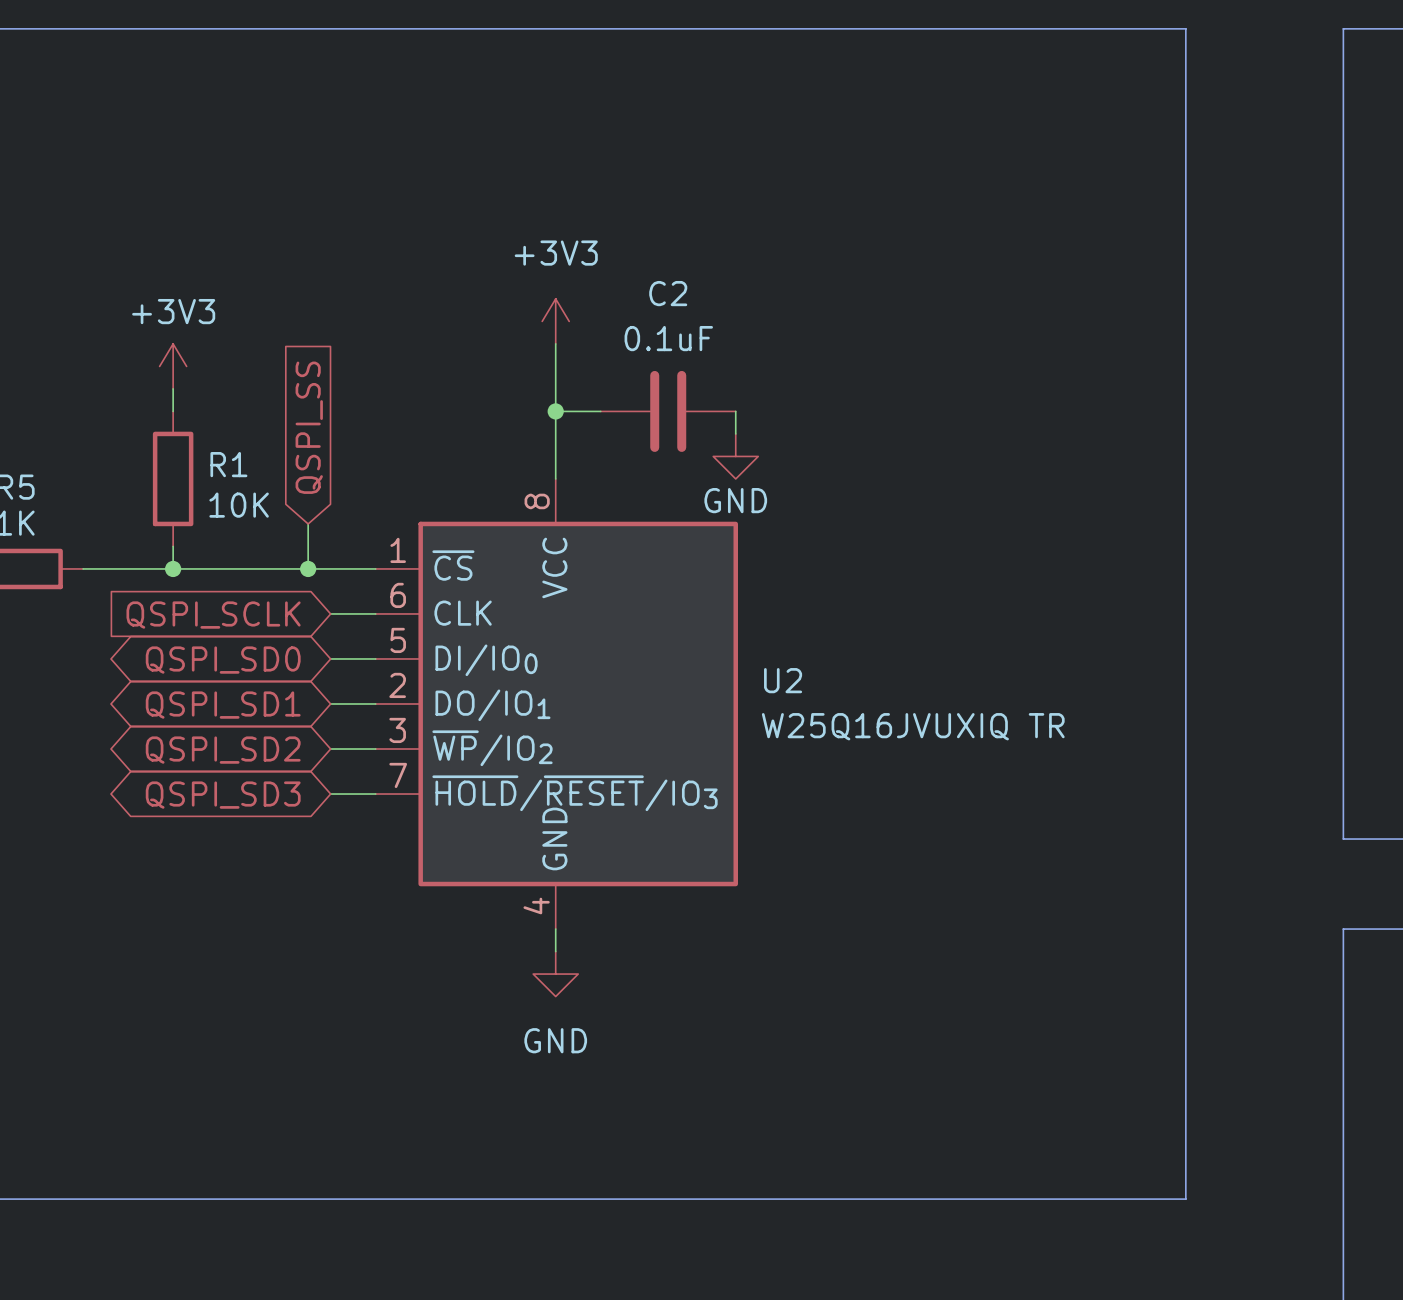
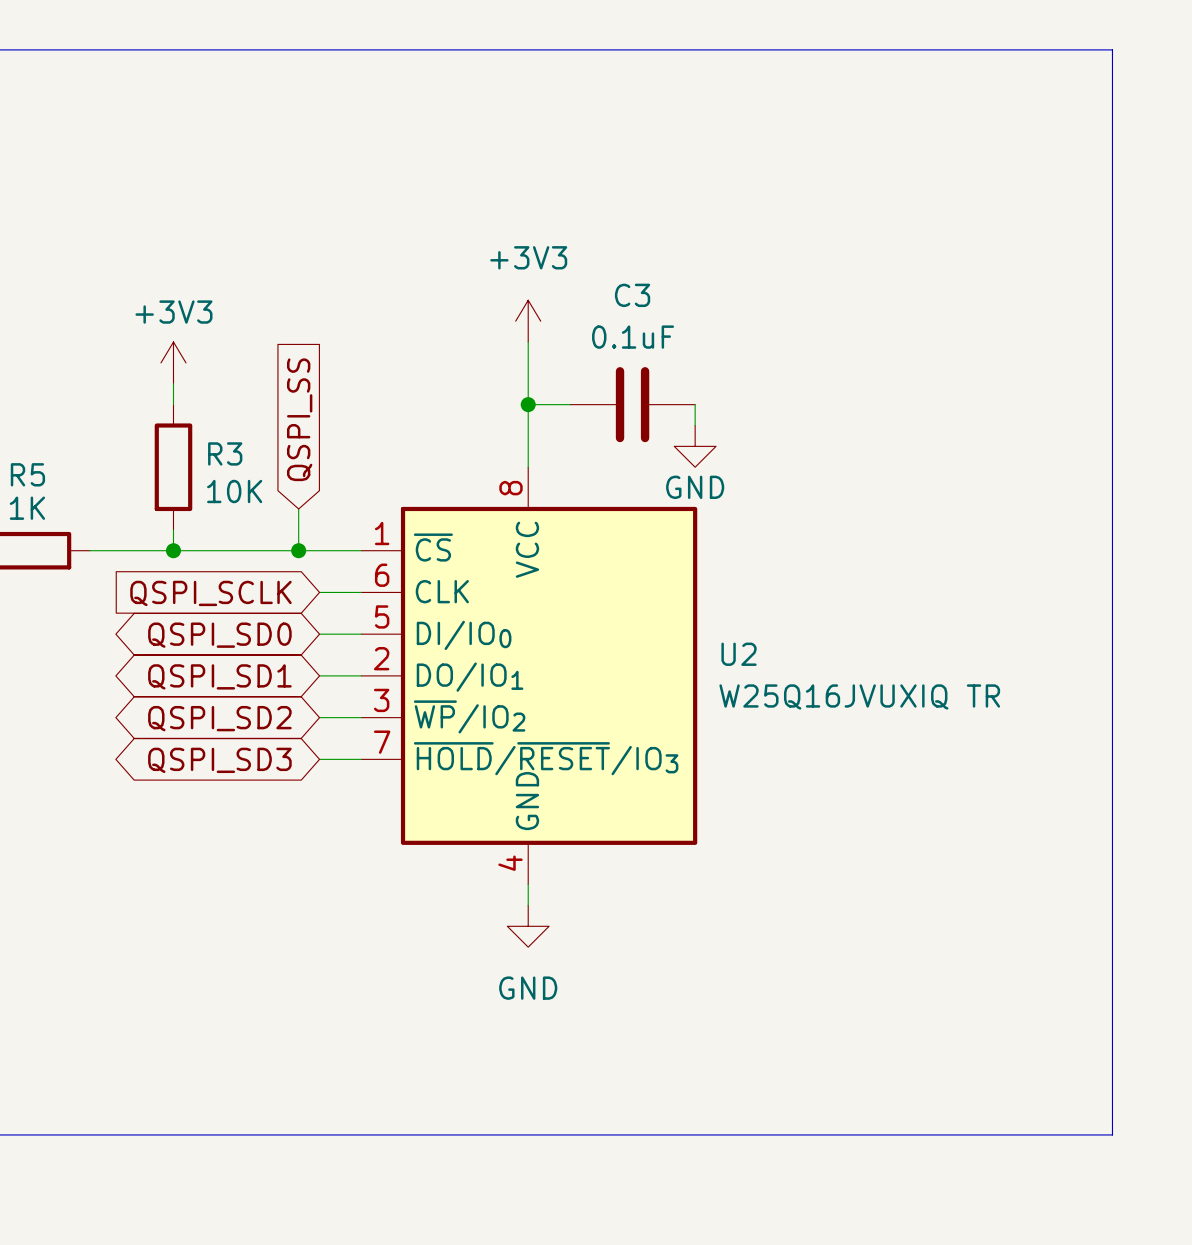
C2 name: C2 (668, 293) -> C3 (632, 295)
R1 name: R1 (228, 464) -> R3 (225, 453)

